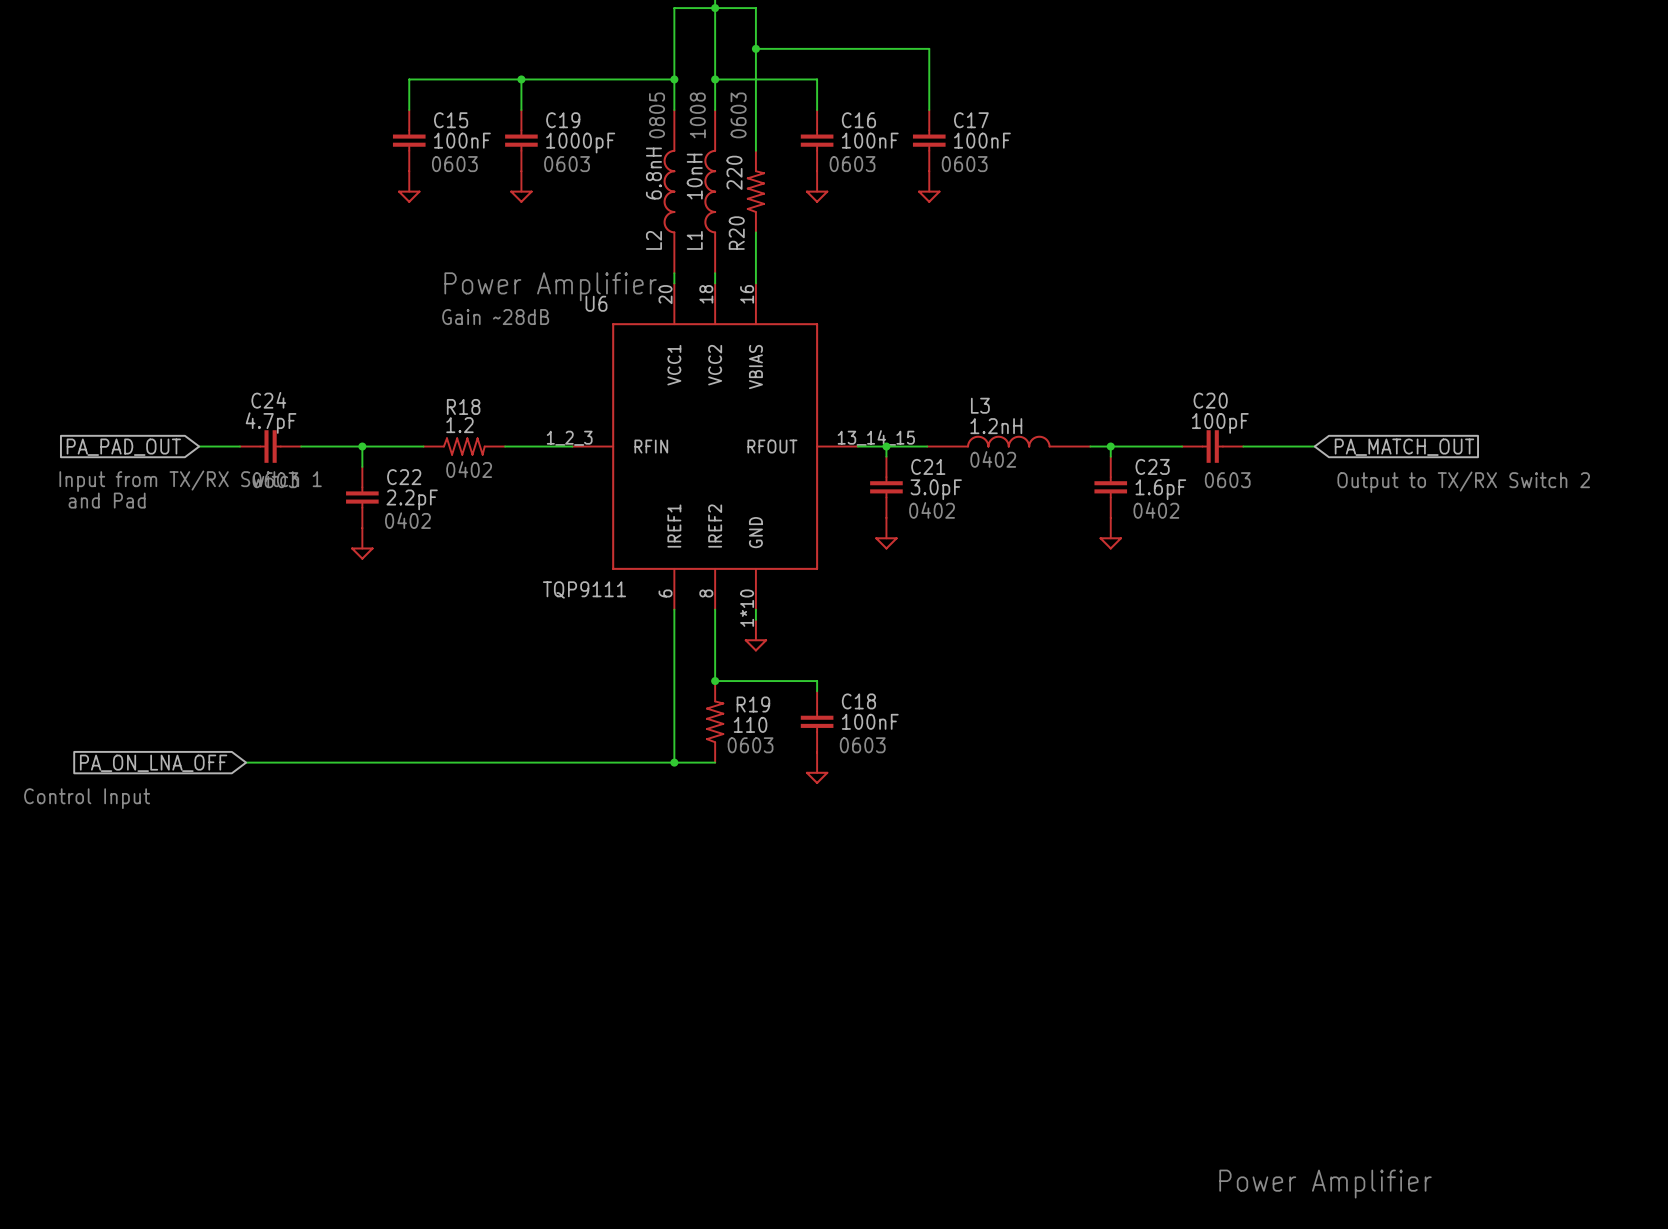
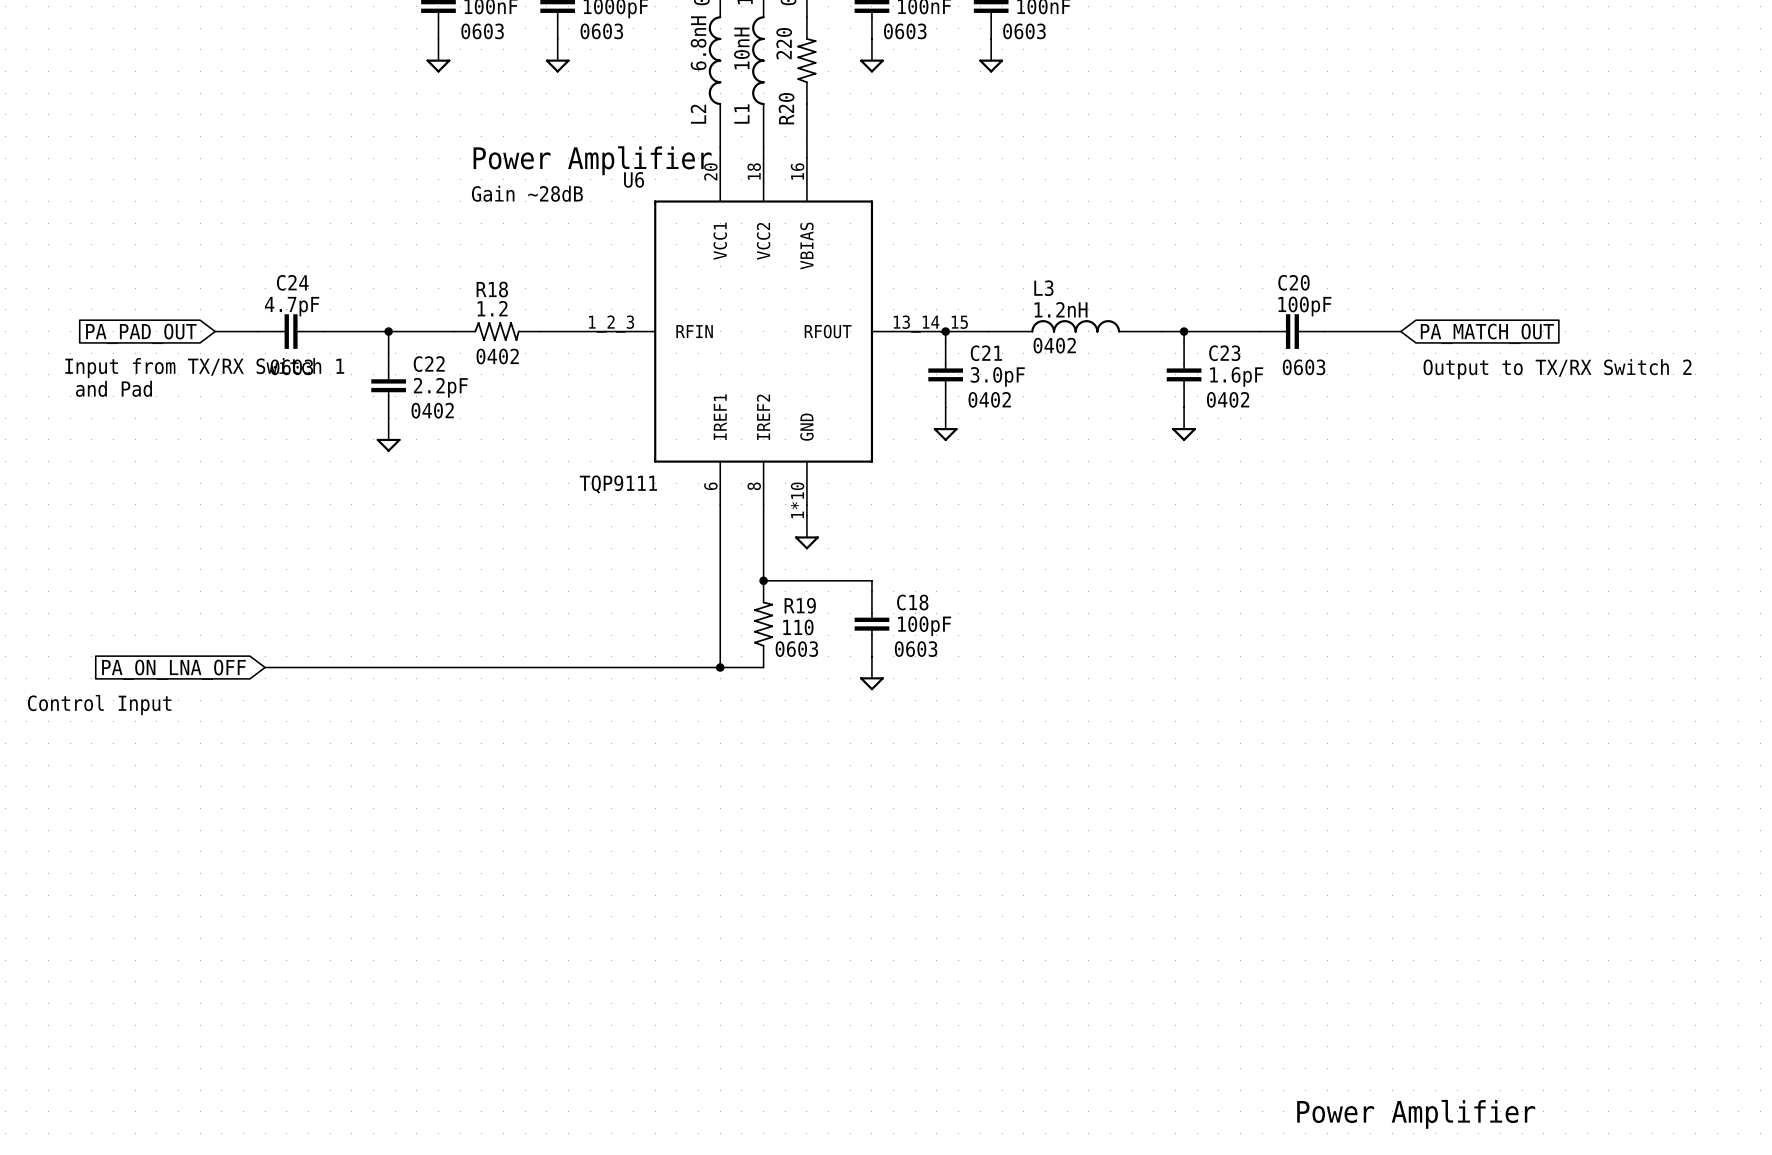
C18 value: 100nF (870, 721) -> 100pF (924, 626)

